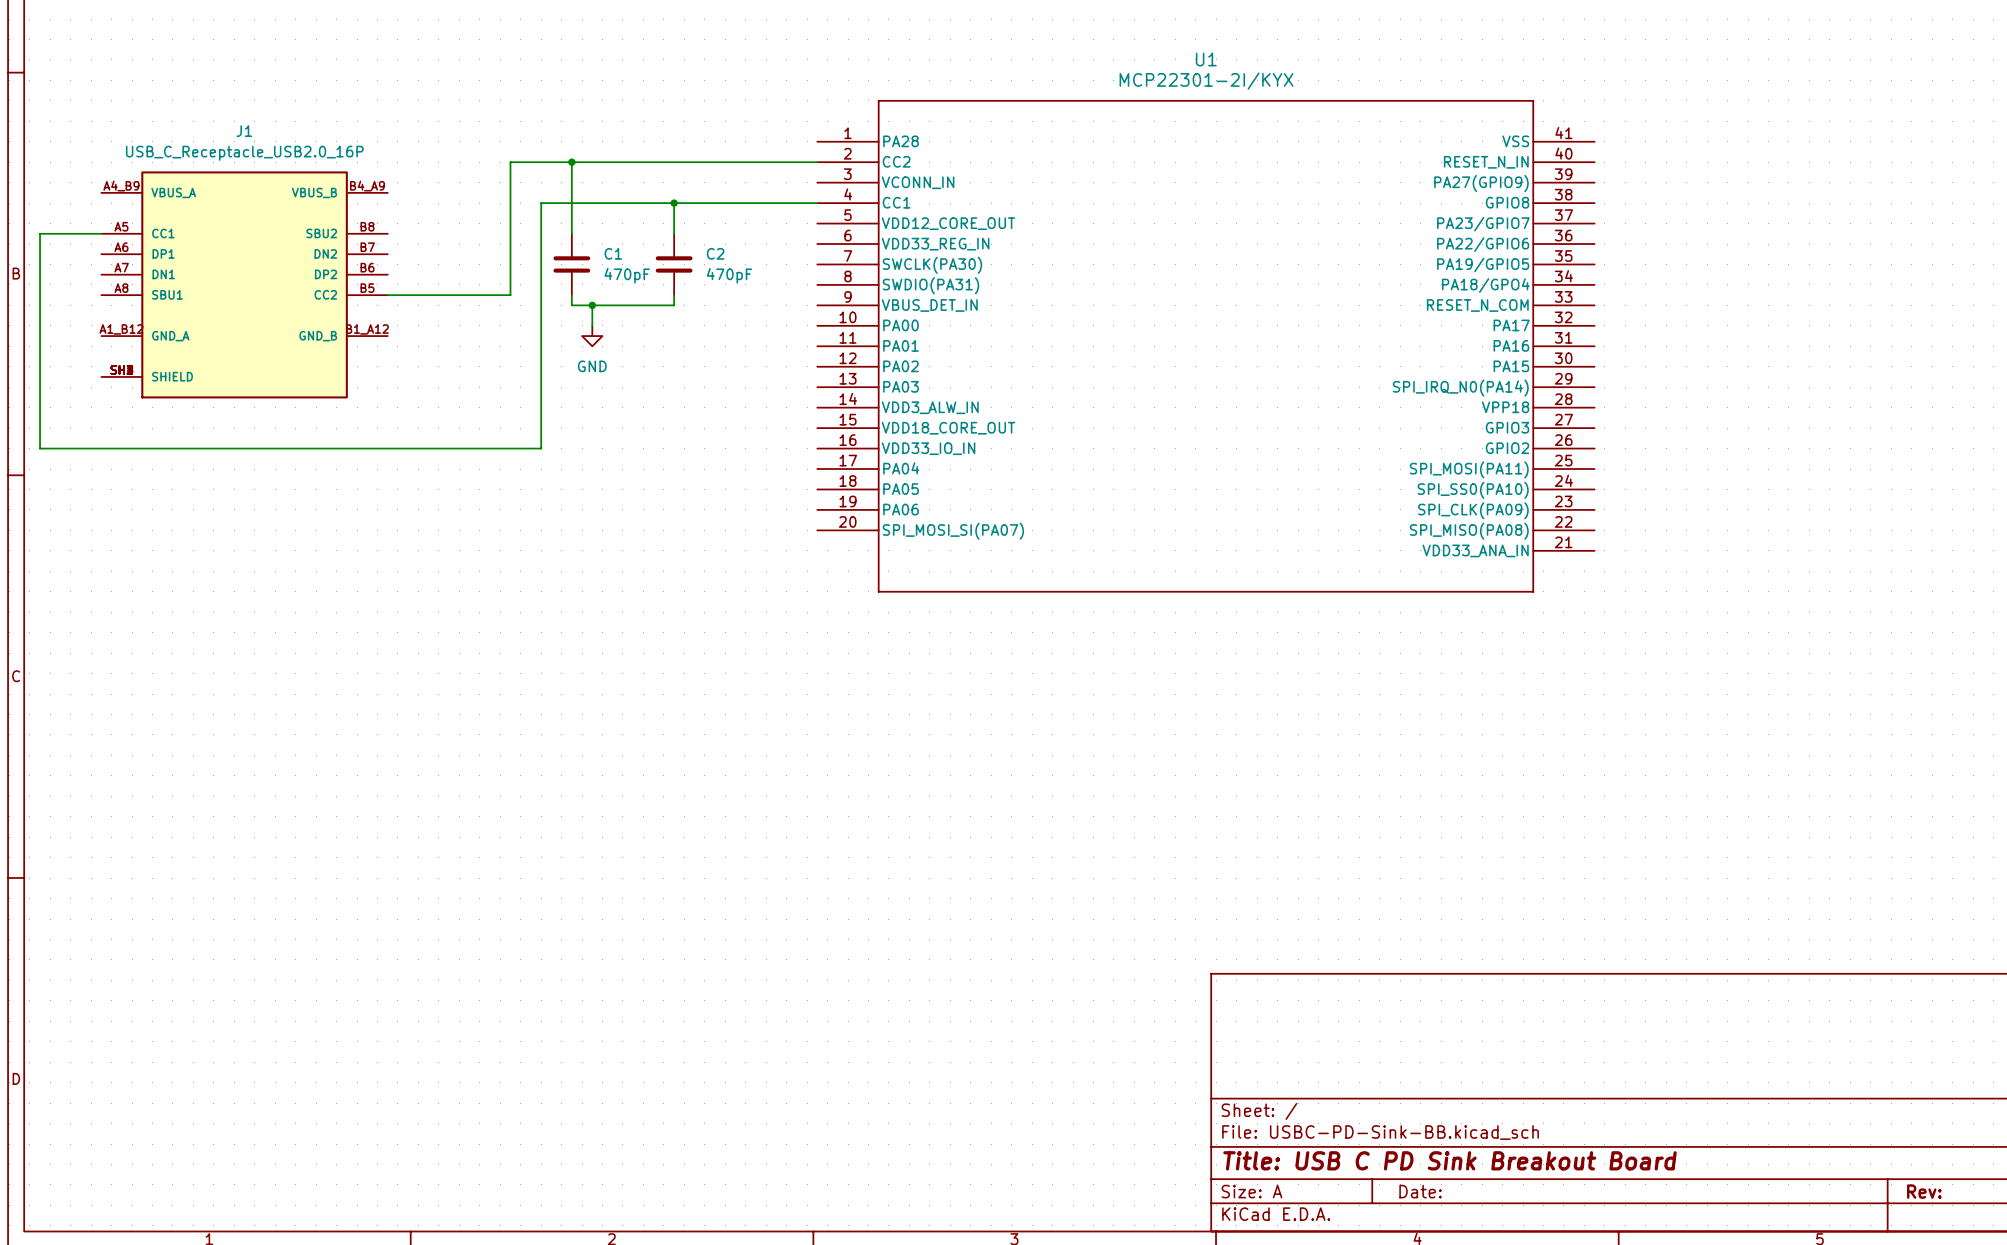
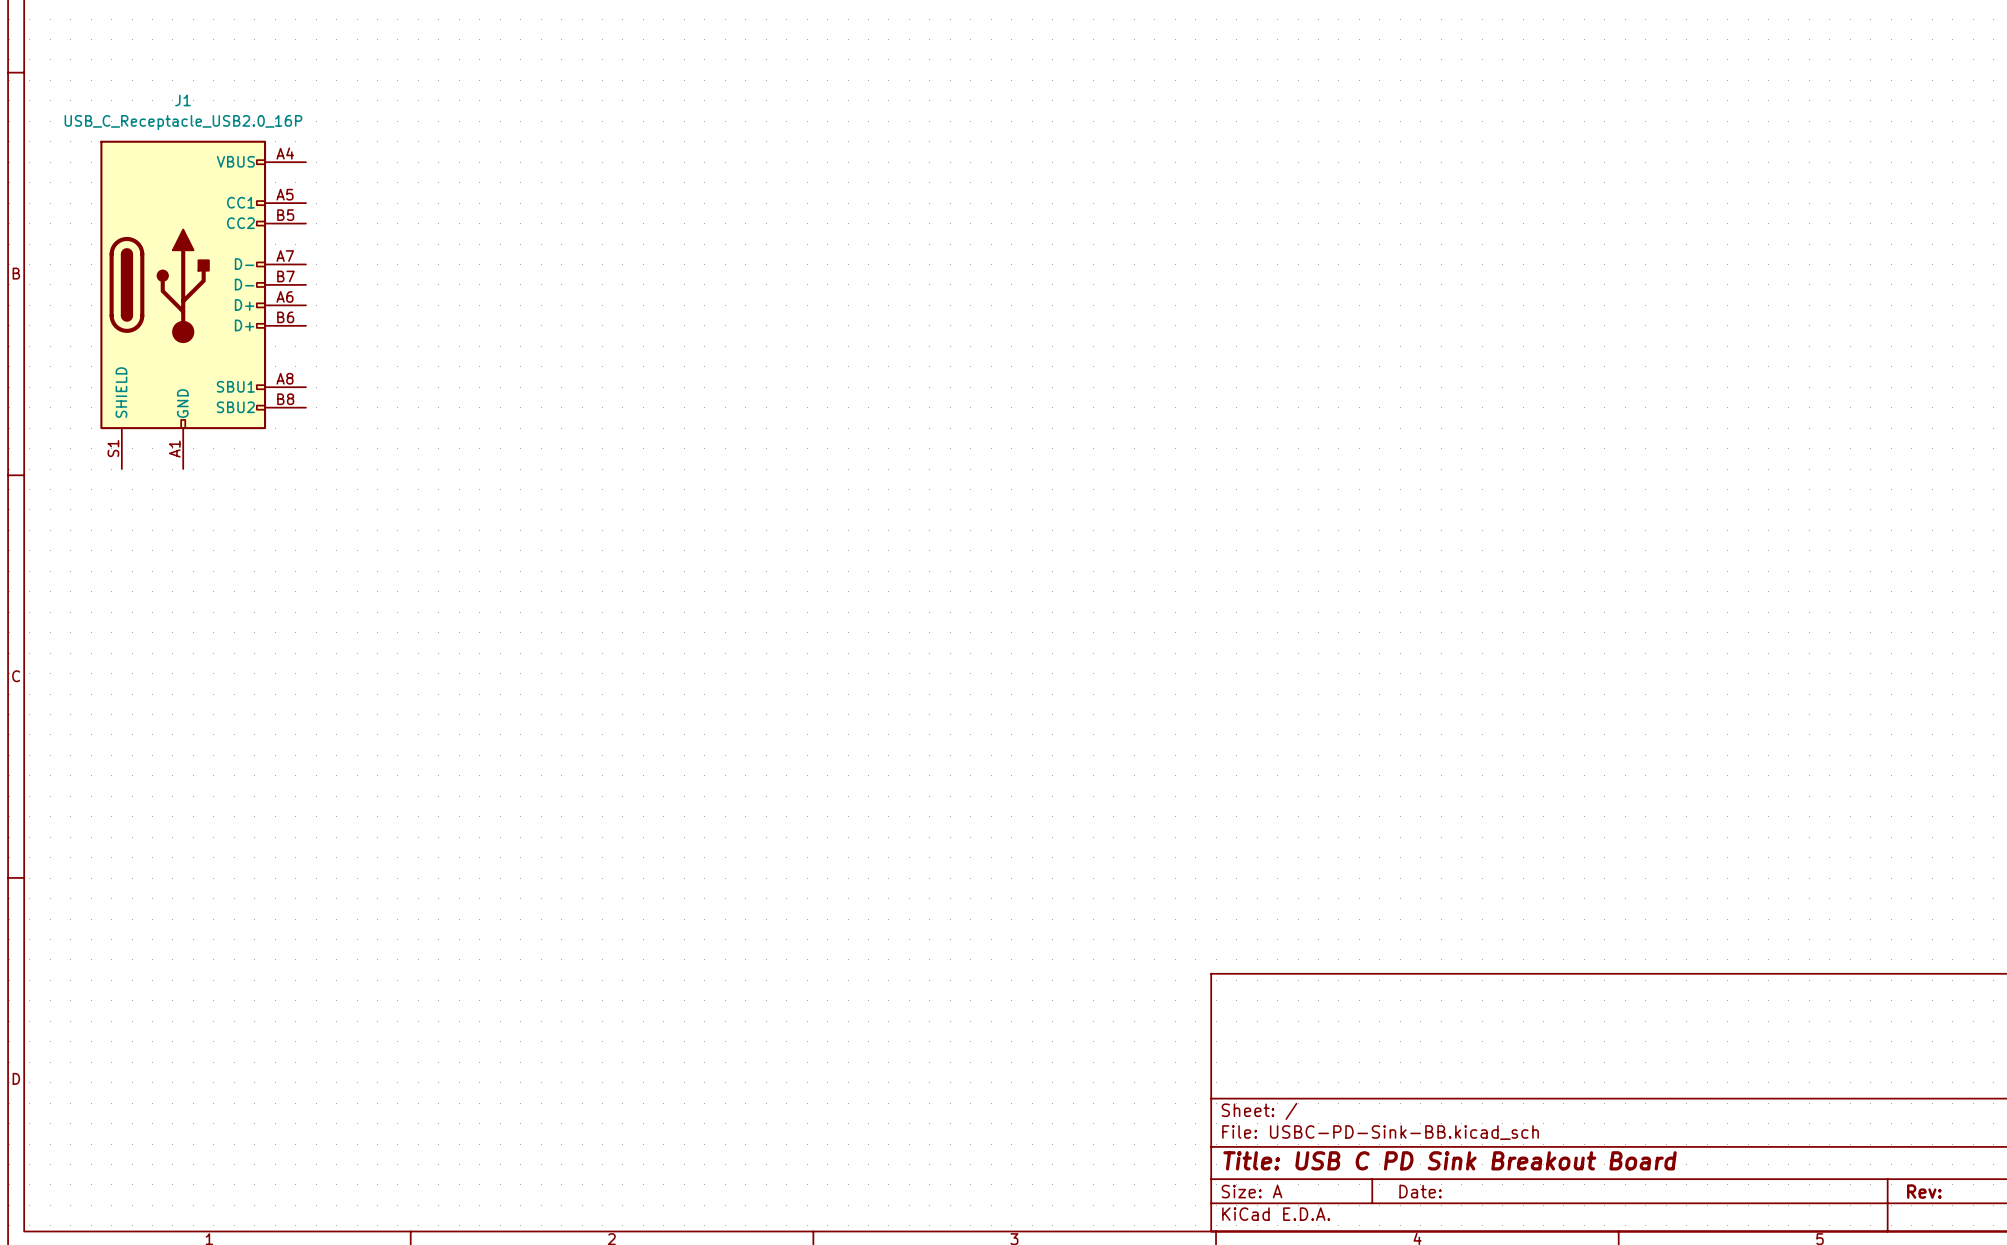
J1 name position: J1 (244, 131) -> J1 (182, 100)
J1 value position: USB_C_Receptacle_USB2.0_16P (244, 153) -> USB_C_Receptacle_USB2.0_16P (183, 122)
wire: (571, 162) (571, 233) -> none
junction: (571, 162) -> none
wire: (817, 162) (510, 162) (510, 295) (387, 295) -> none
J1 symbol: [101, 171, 388, 399] -> [100, 140, 306, 470]
wire: (674, 203) (674, 233) -> none
junction: (674, 203) -> none
wire: (817, 203) (541, 203) (541, 448) (40, 448) (40, 233) (101, 233) -> none
C1: 470pF (571, 264) -> none
C2: 470pF (674, 264) -> none
wire: (571, 295) (571, 305) (674, 305) (674, 295) -> none
wire: (592, 305) (592, 325) -> none
junction: (592, 305) -> none
power symbol: GND (592, 336) -> none
U1: MCP22301-2I/KYX (1205, 346) -> none

